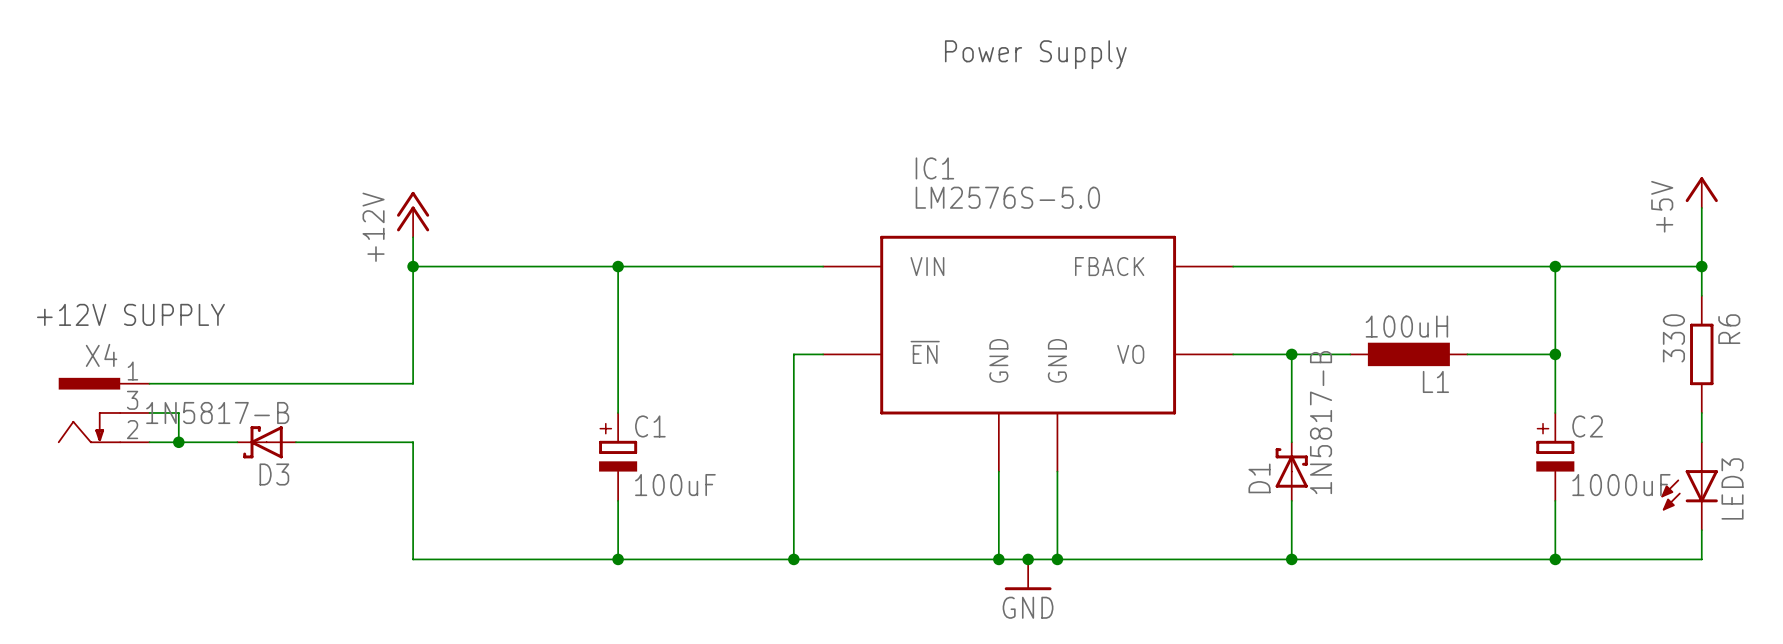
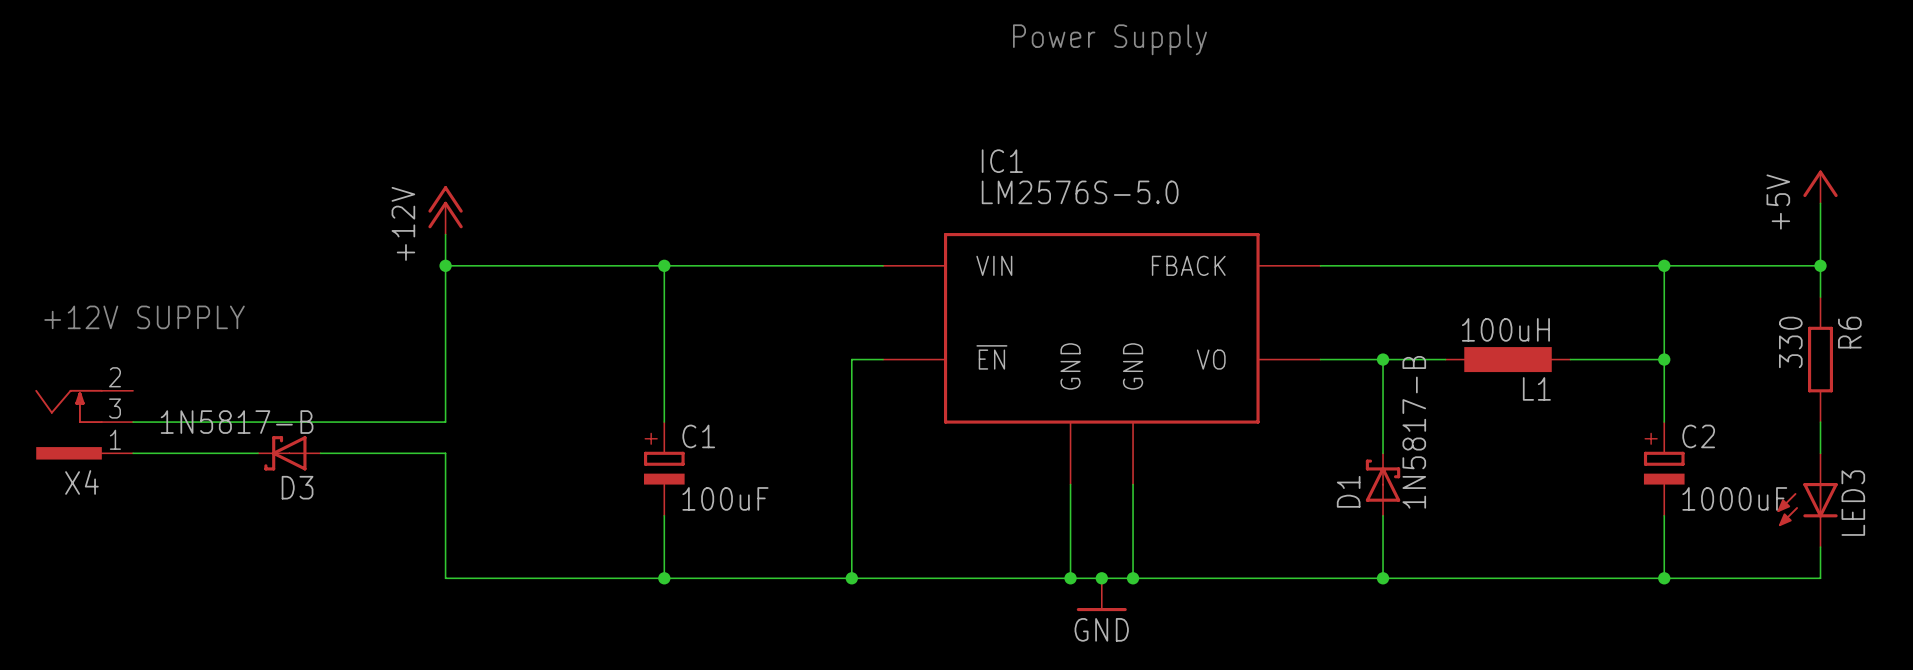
wire: (149, 383) (413, 383) -> (195, 422) (445, 422) (445, 390)
X4 flip: as is (89, 410) -> up-down (69, 424)
wire: (178, 412) (178, 442) -> none
junction: (178, 442) -> none

